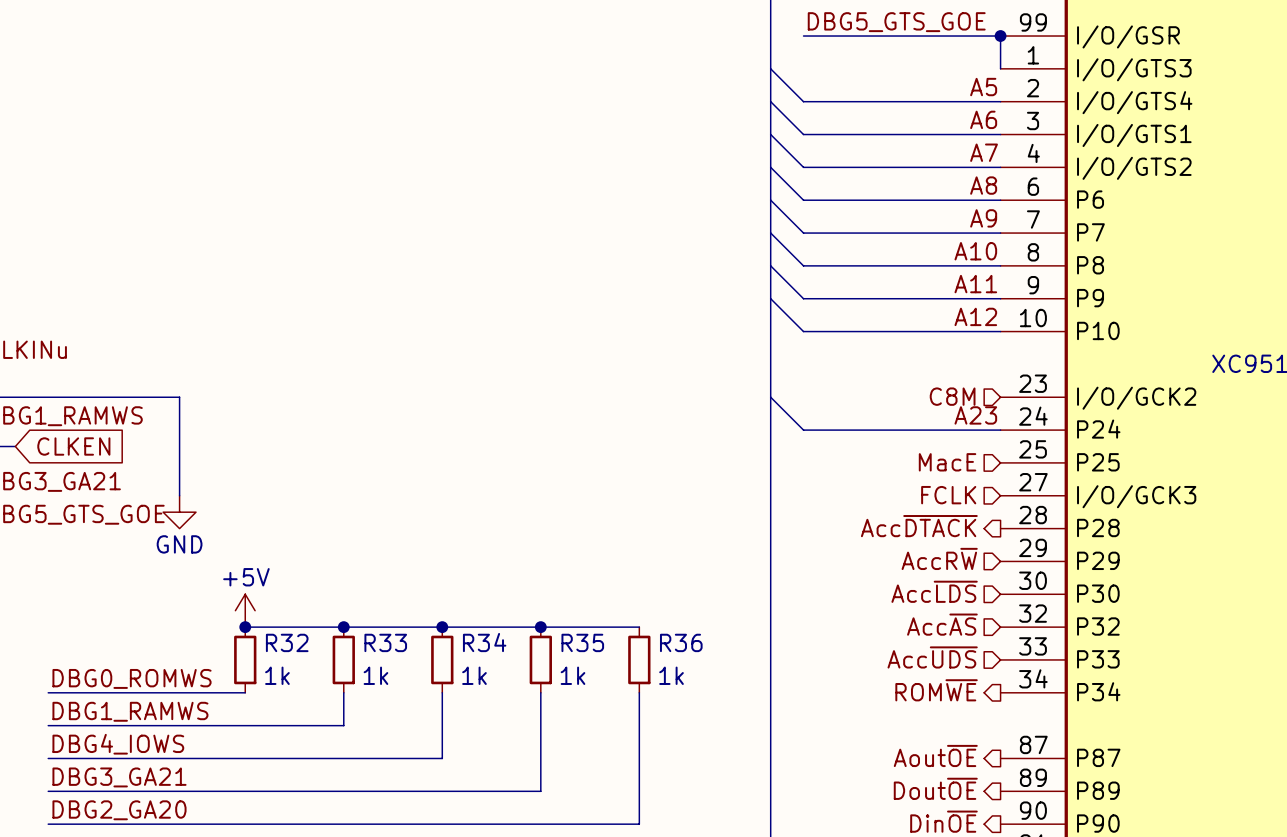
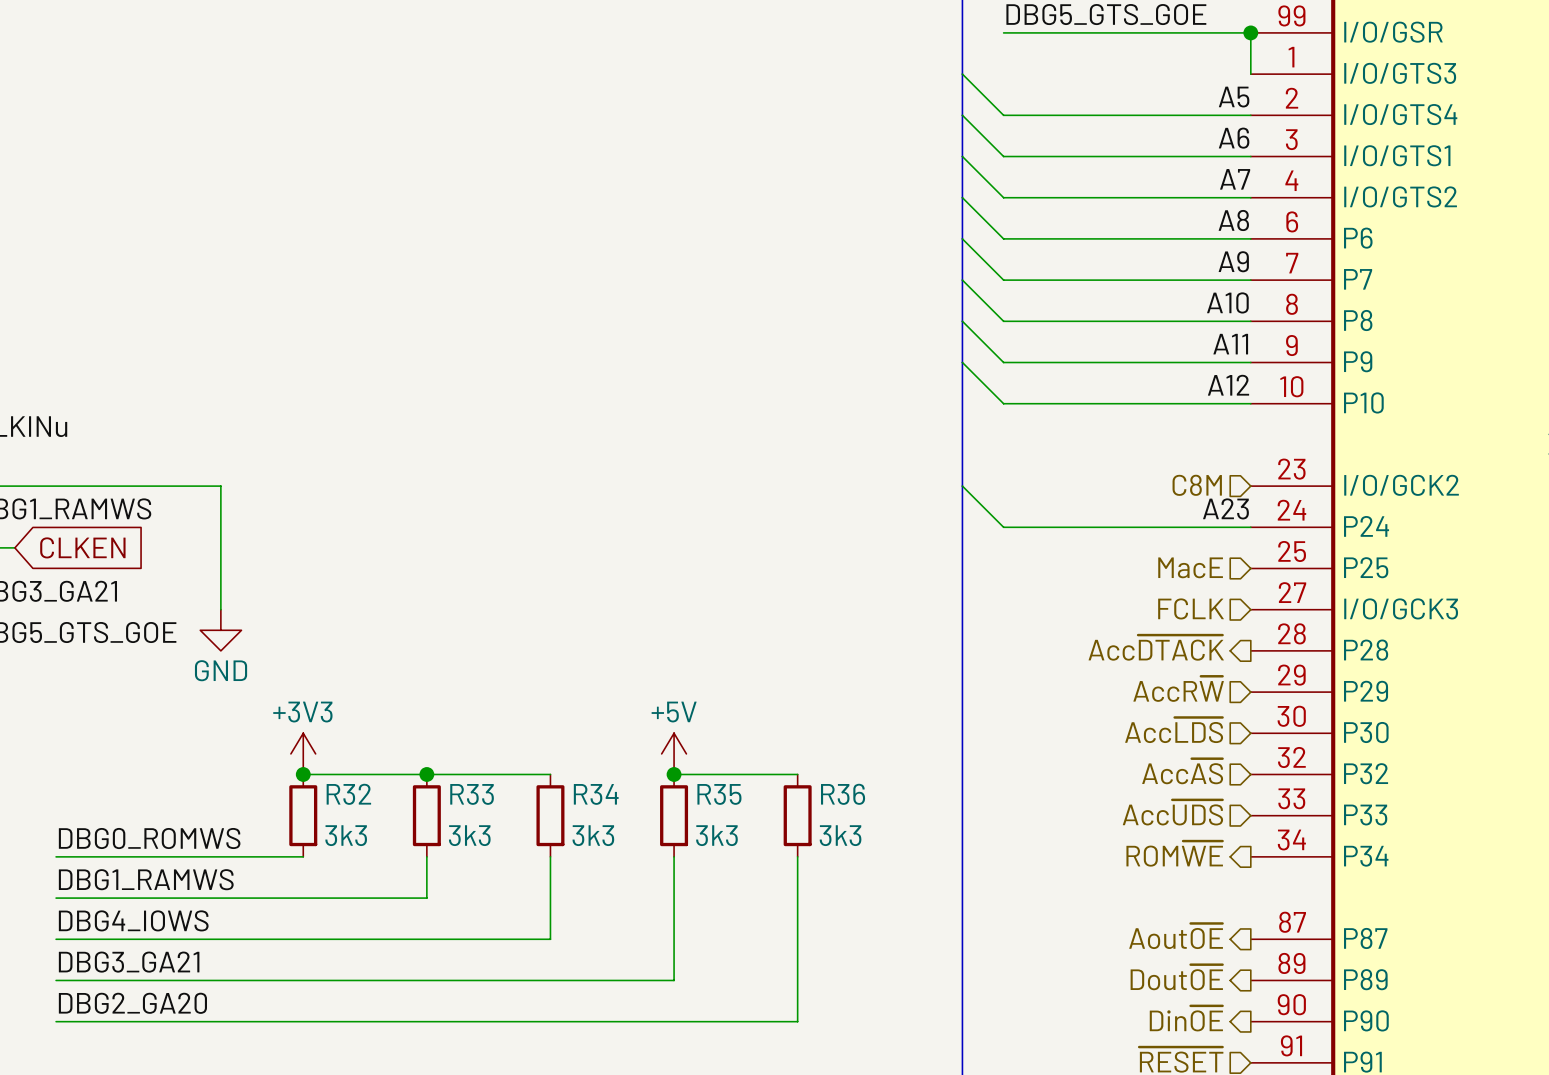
power symbol: +5V (245, 610) -> +3V3 (303, 753)
power symbol: none -> +5V (674, 753)
wire: (442, 627) (540, 627) -> none
junction: (442, 627) -> none
R32 value: 1k (277, 675) -> 3k3 (346, 835)
R33 value: 1k (375, 675) -> 3k3 (469, 835)
R34 value: 1k (474, 675) -> 3k3 (593, 835)
R35 value: 1k (572, 675) -> 3k3 (716, 835)
R36 value: 1k (671, 675) -> 3k3 (840, 835)

